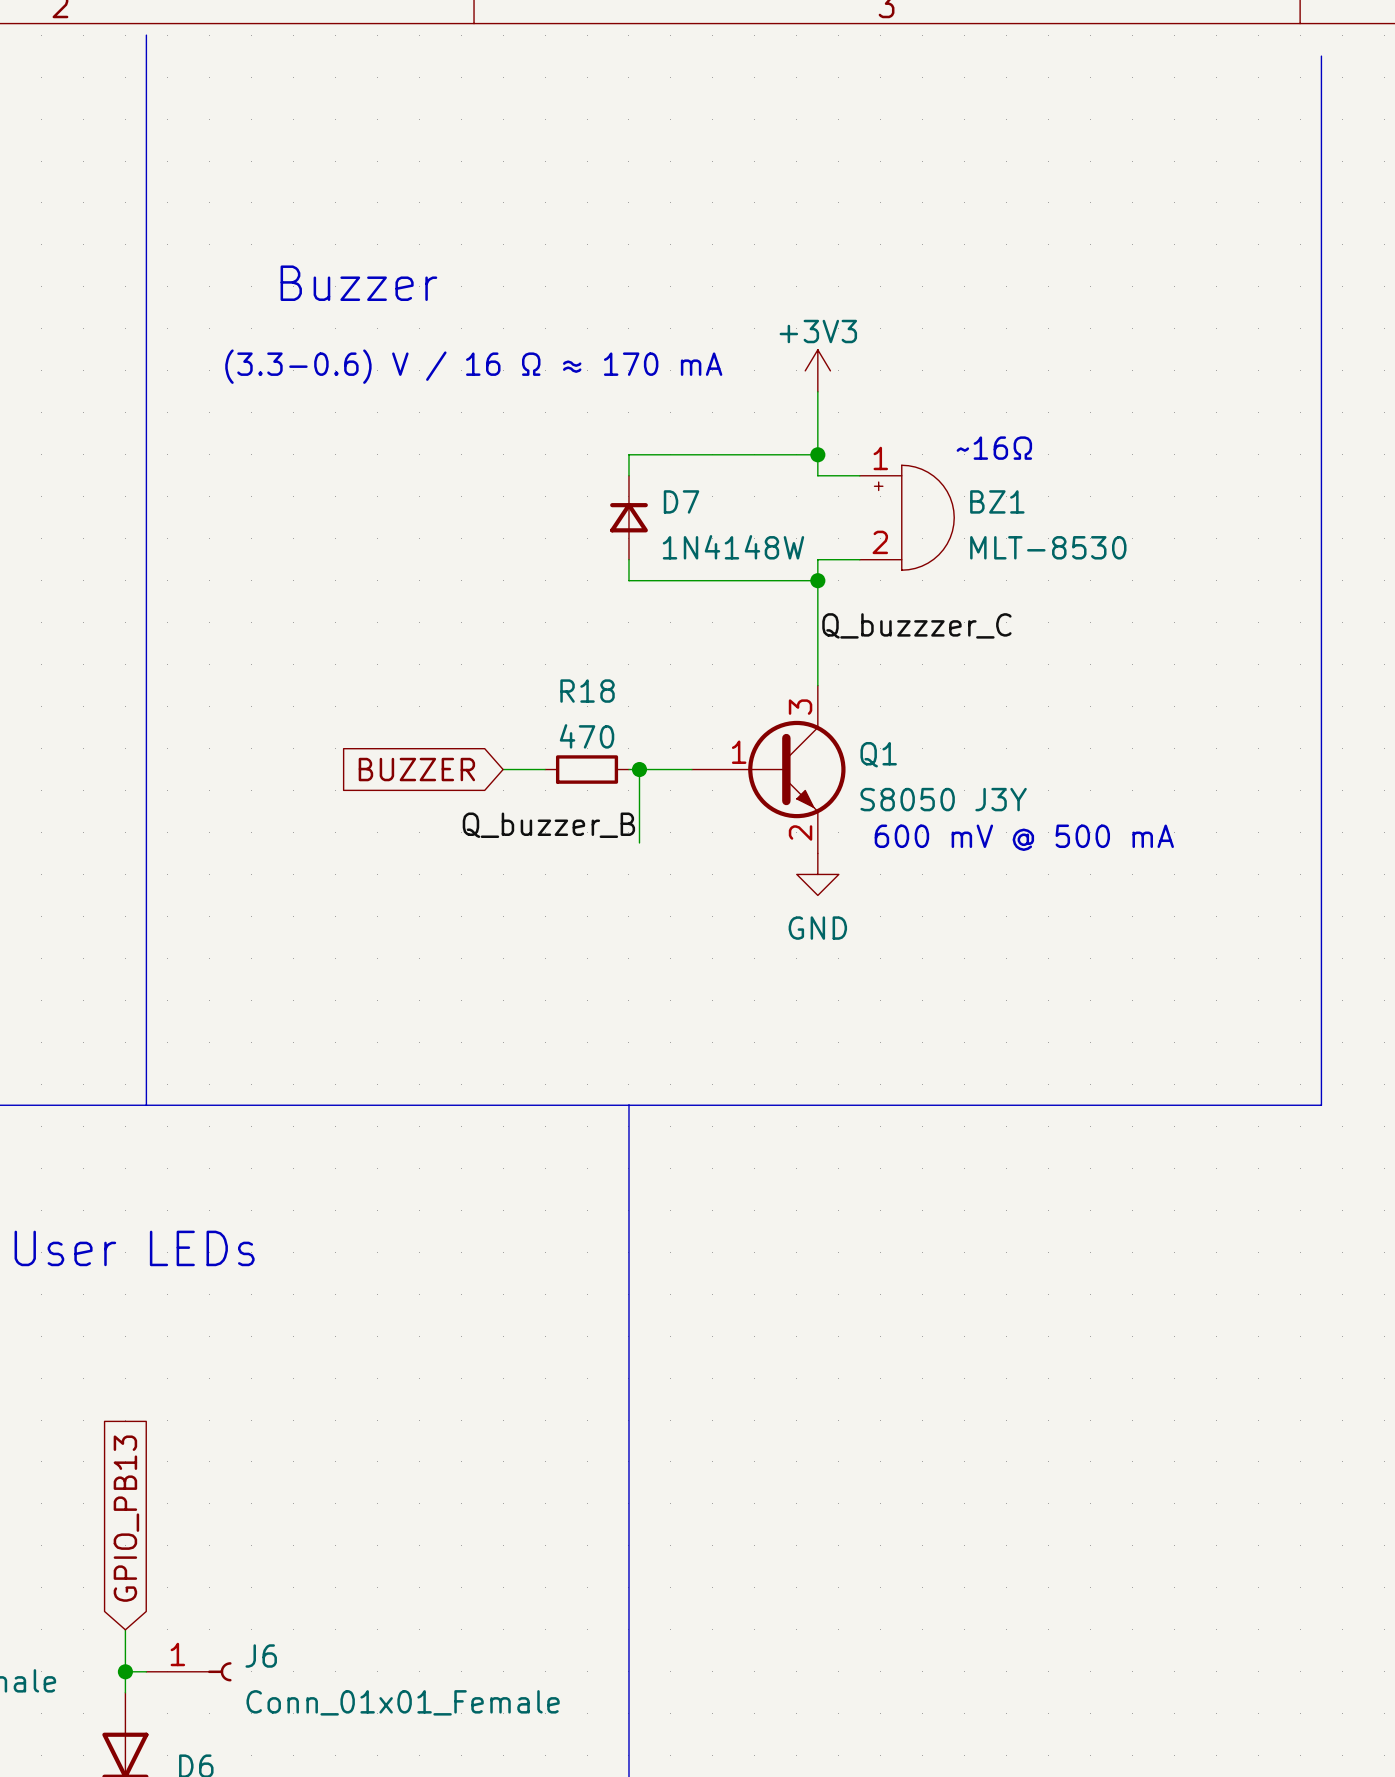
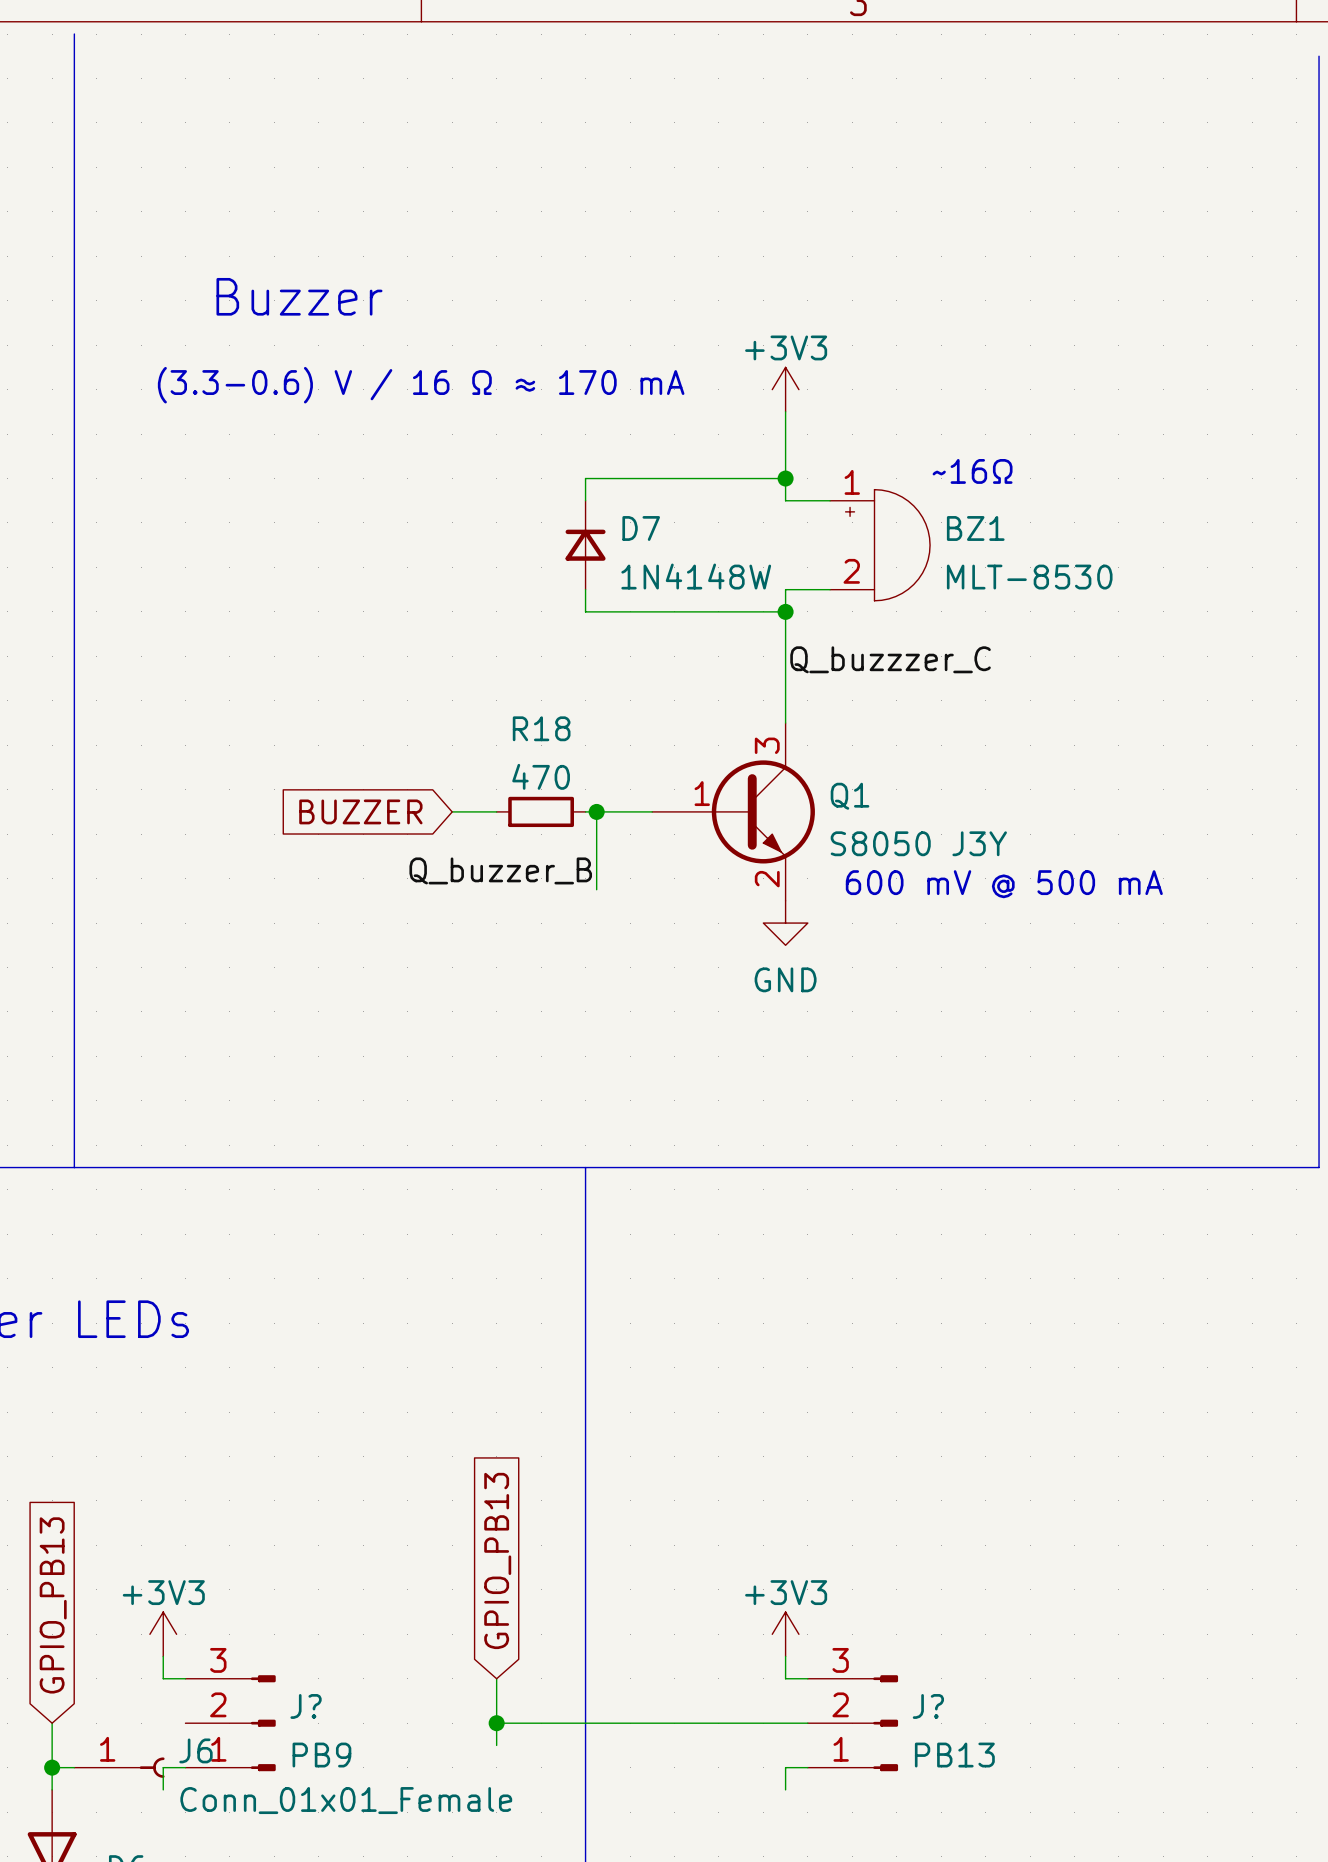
global label: none -> GPIO_PB13 (497, 1560)
power symbol: none -> +3V3 (163, 1634)
power symbol: none -> +3V3 (785, 1634)
wire: none -> (163, 1656) (163, 1678) (185, 1678)
wire: none -> (785, 1656) (785, 1678) (807, 1678)
wire: none -> (496, 1678) (496, 1745)
J?: none -> PB9 (230, 1723)
wire: none -> (496, 1723) (807, 1723)
junction: none -> (496, 1723)
J?: none -> PB13 (852, 1723)
wire: none -> (185, 1767) (163, 1767) (163, 1789)
wire: none -> (807, 1767) (785, 1767) (785, 1789)

